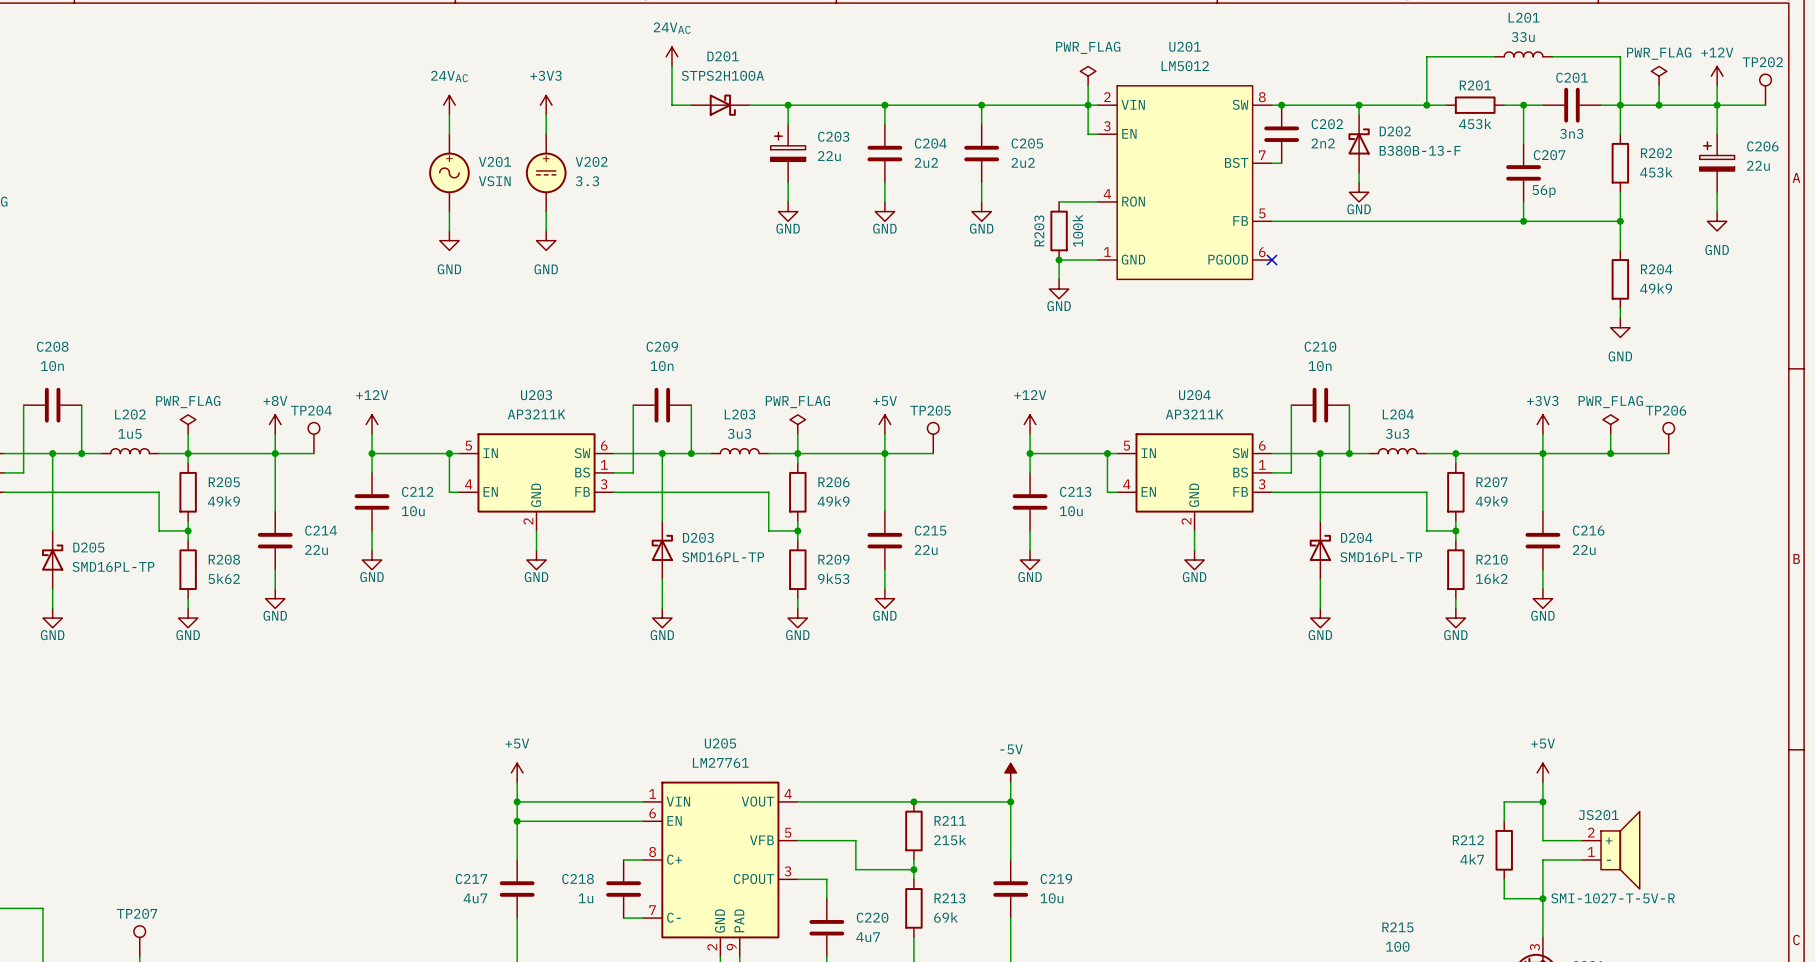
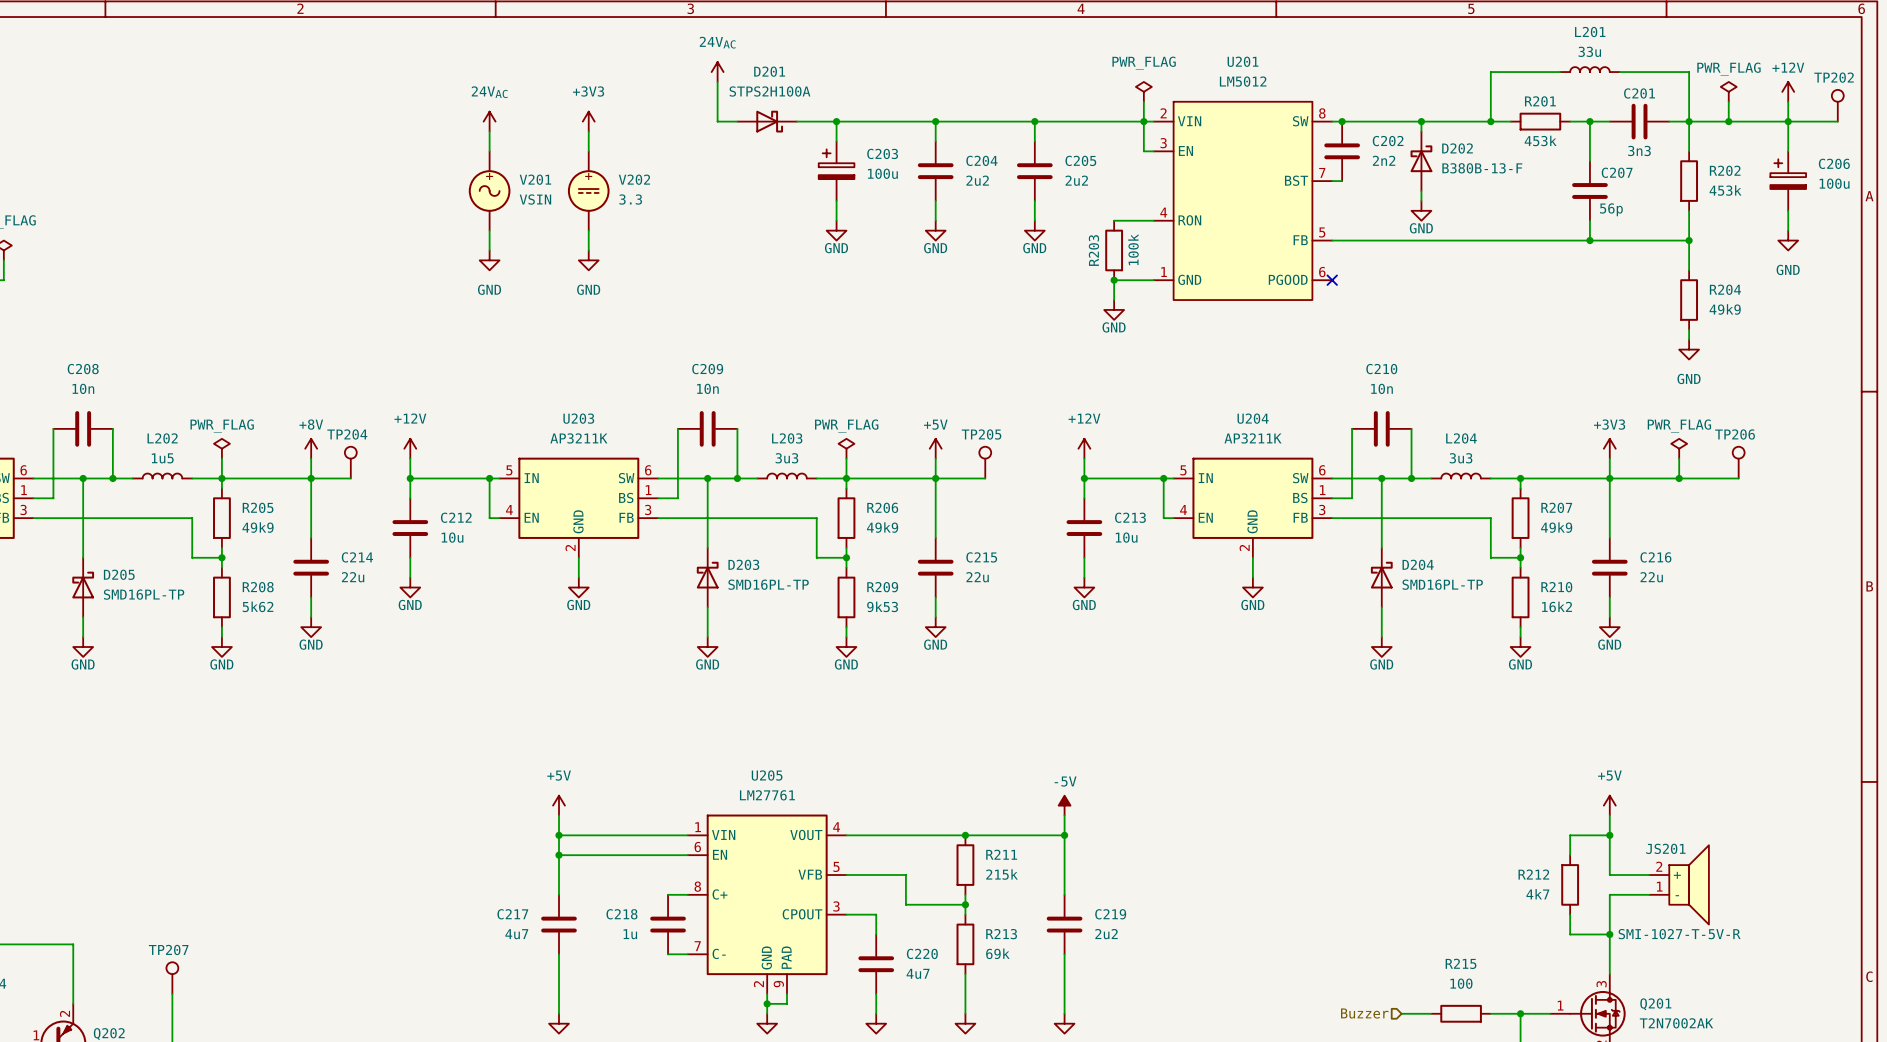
C203 value: 22u (829, 156) -> 100u (882, 173)
C206 value: 22u (1758, 165) -> 100u (1834, 183)
C219 value: 10u (1051, 898) -> 2u2 (1106, 934)

